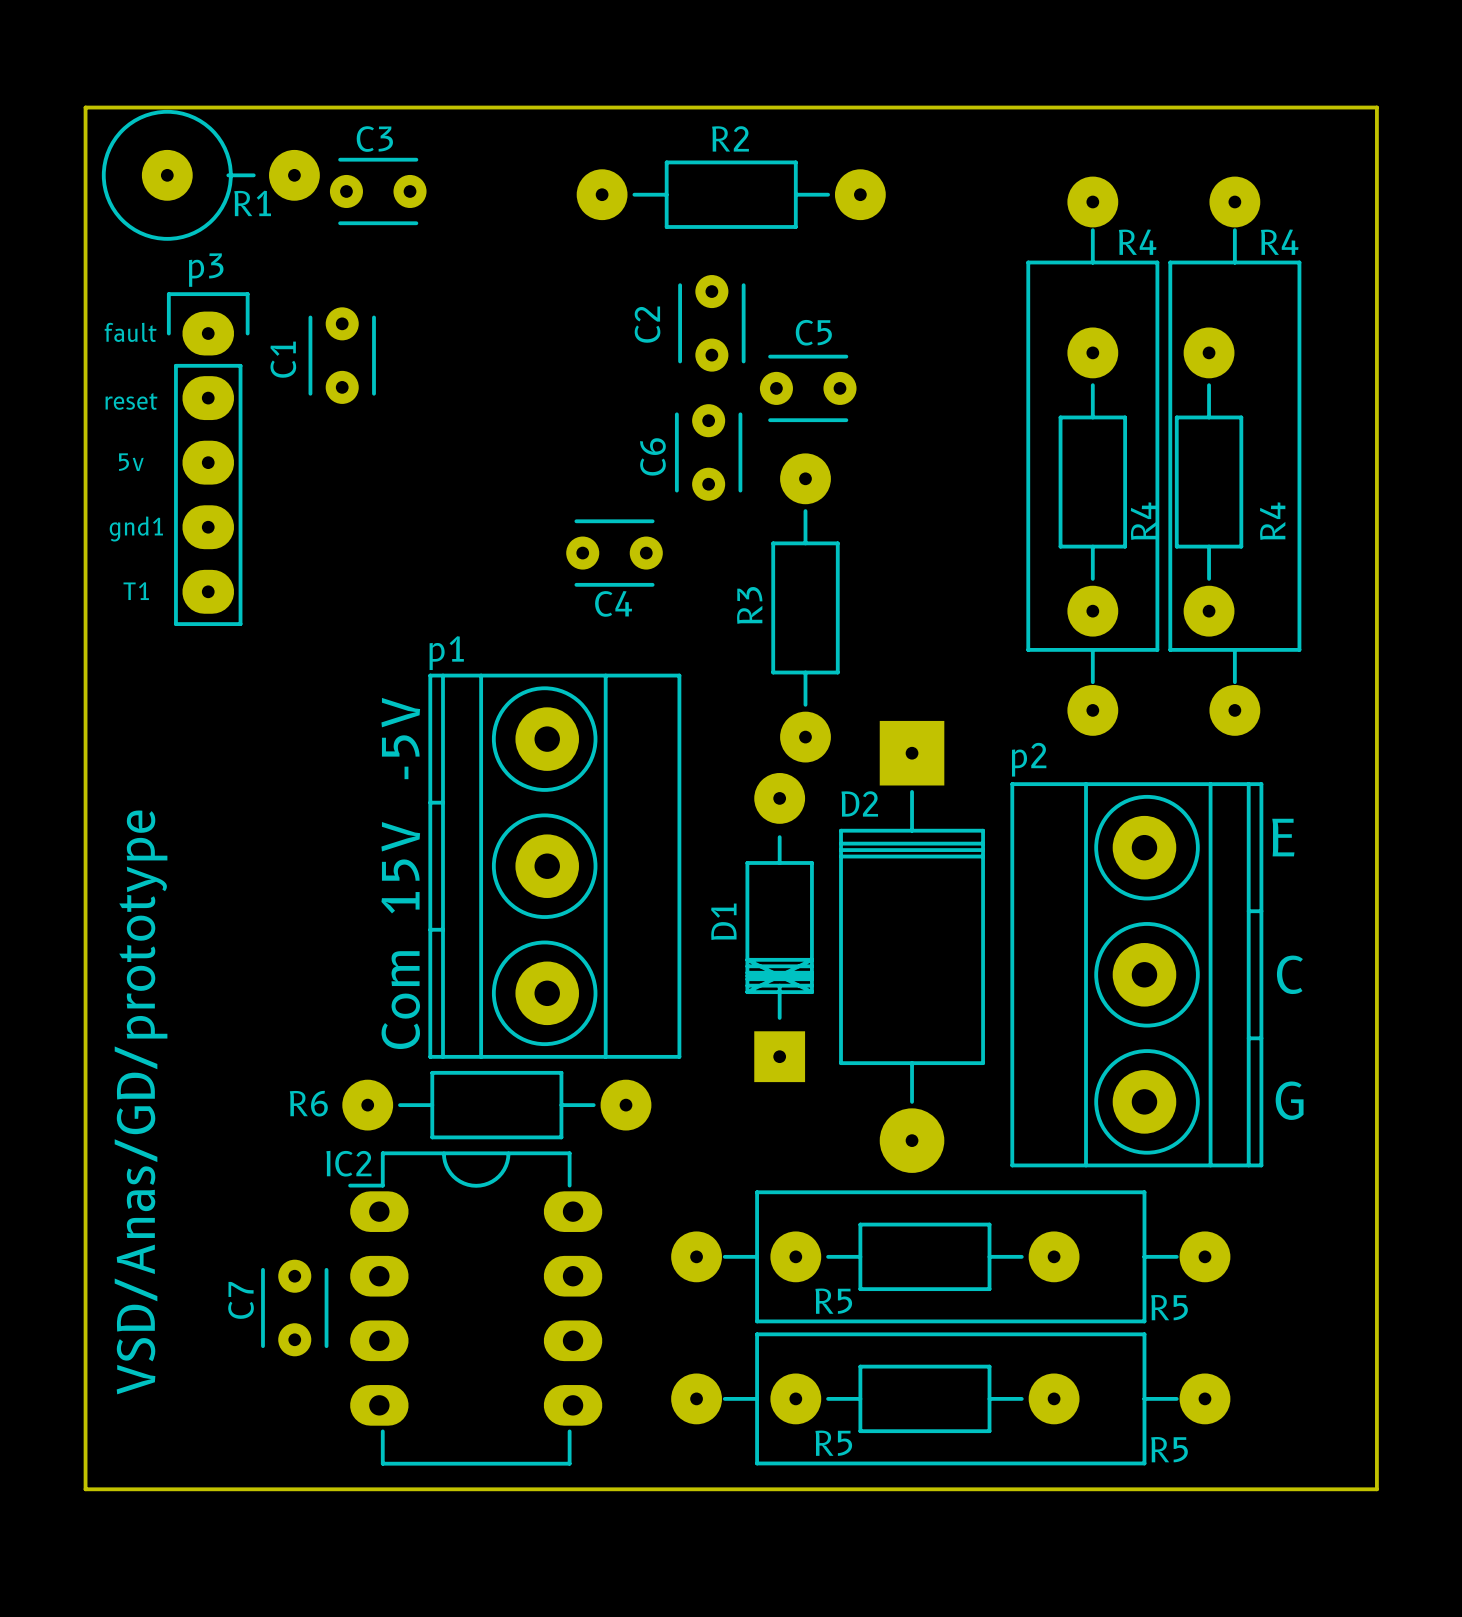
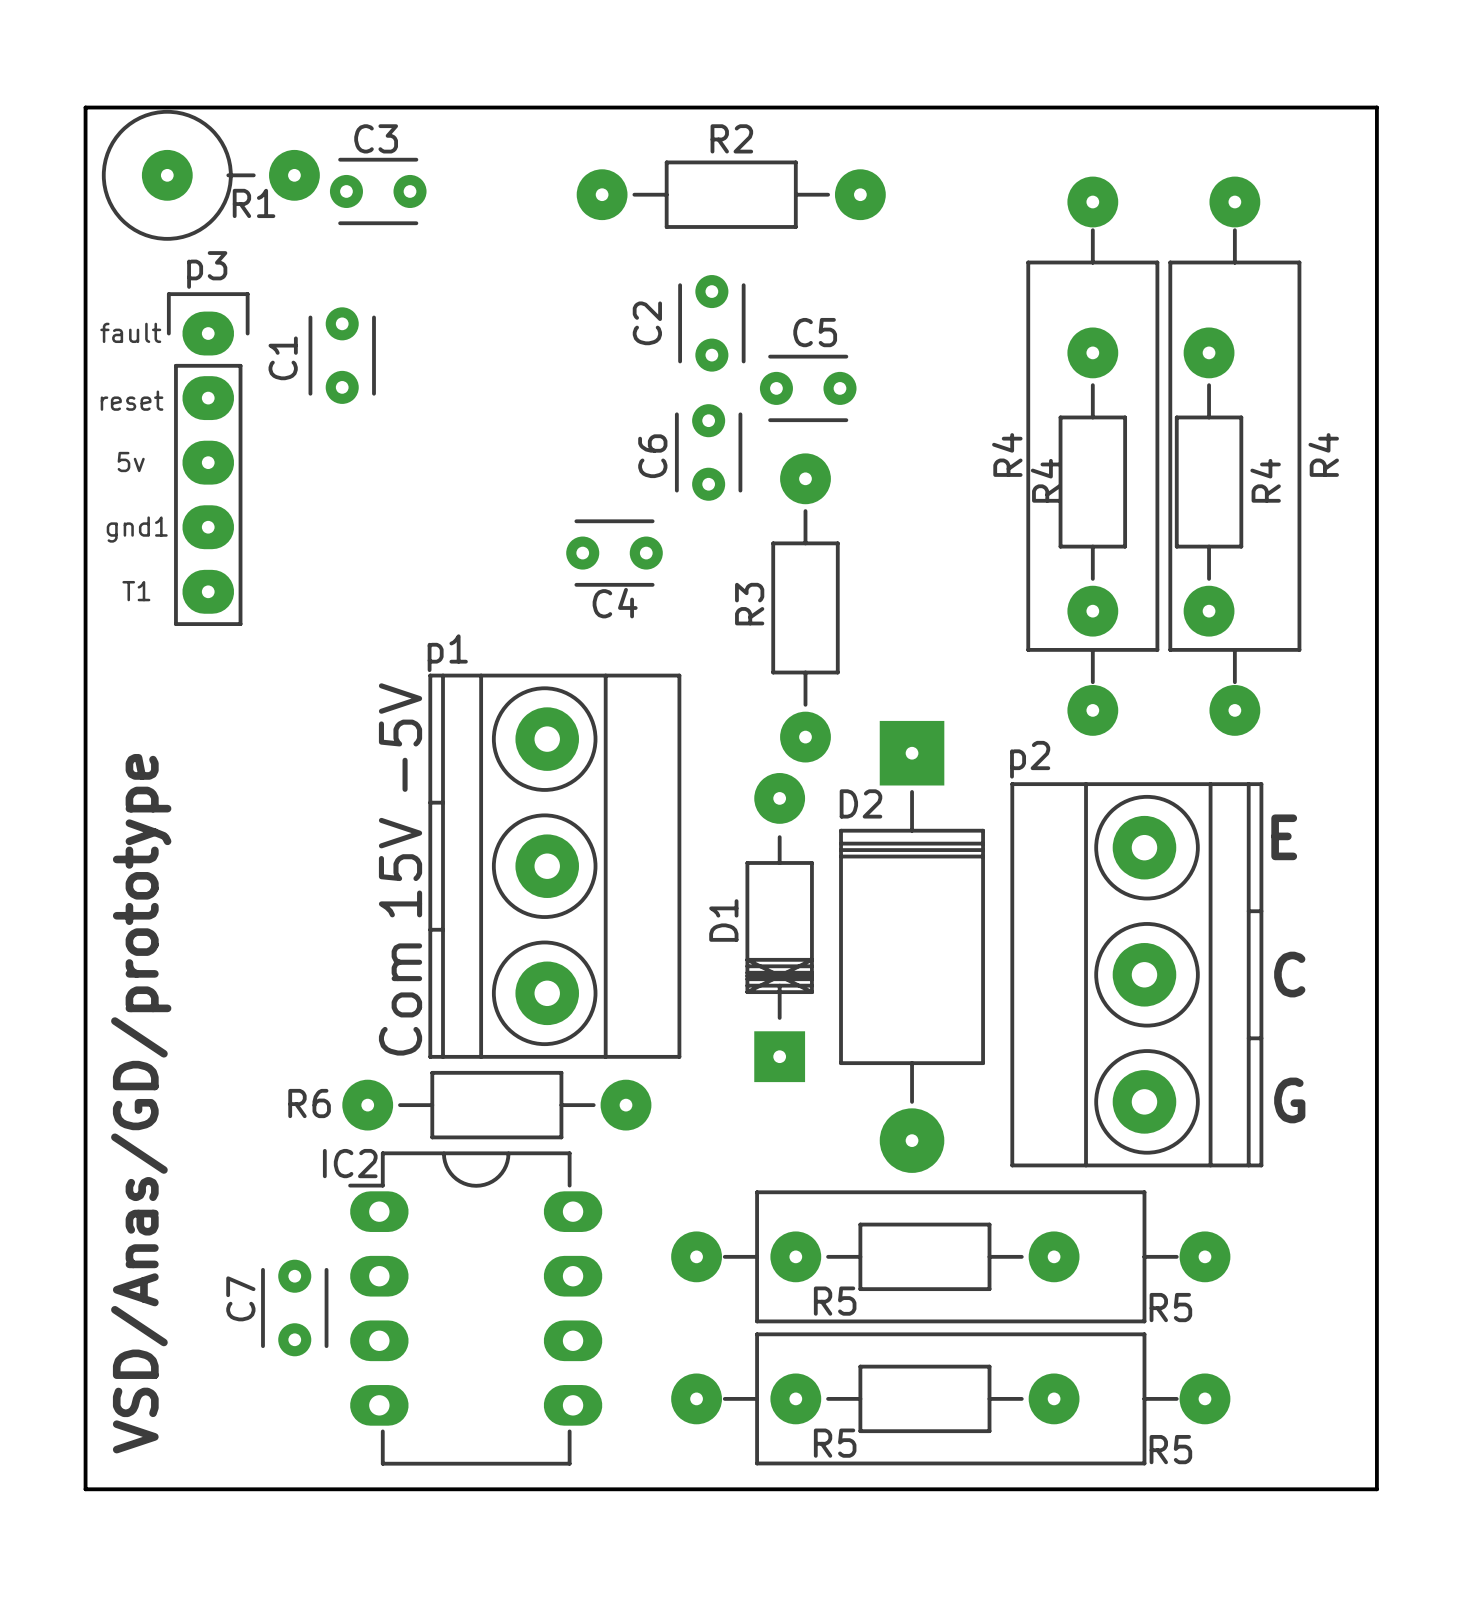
R4 name rotation: 0° (1137, 242) -> 90° counterclockwise (1007, 454)
R4 name position: R4 (1137, 242) -> R4 (1007, 454)
R4 name rotation: 0° (1279, 242) -> 90° counterclockwise (1323, 454)
R4 name position: R4 (1279, 242) -> R4 (1323, 454)
R4 name position: R4 (1143, 521) -> R4 (1046, 480)
R4 name position: R4 (1272, 521) -> R4 (1265, 480)

